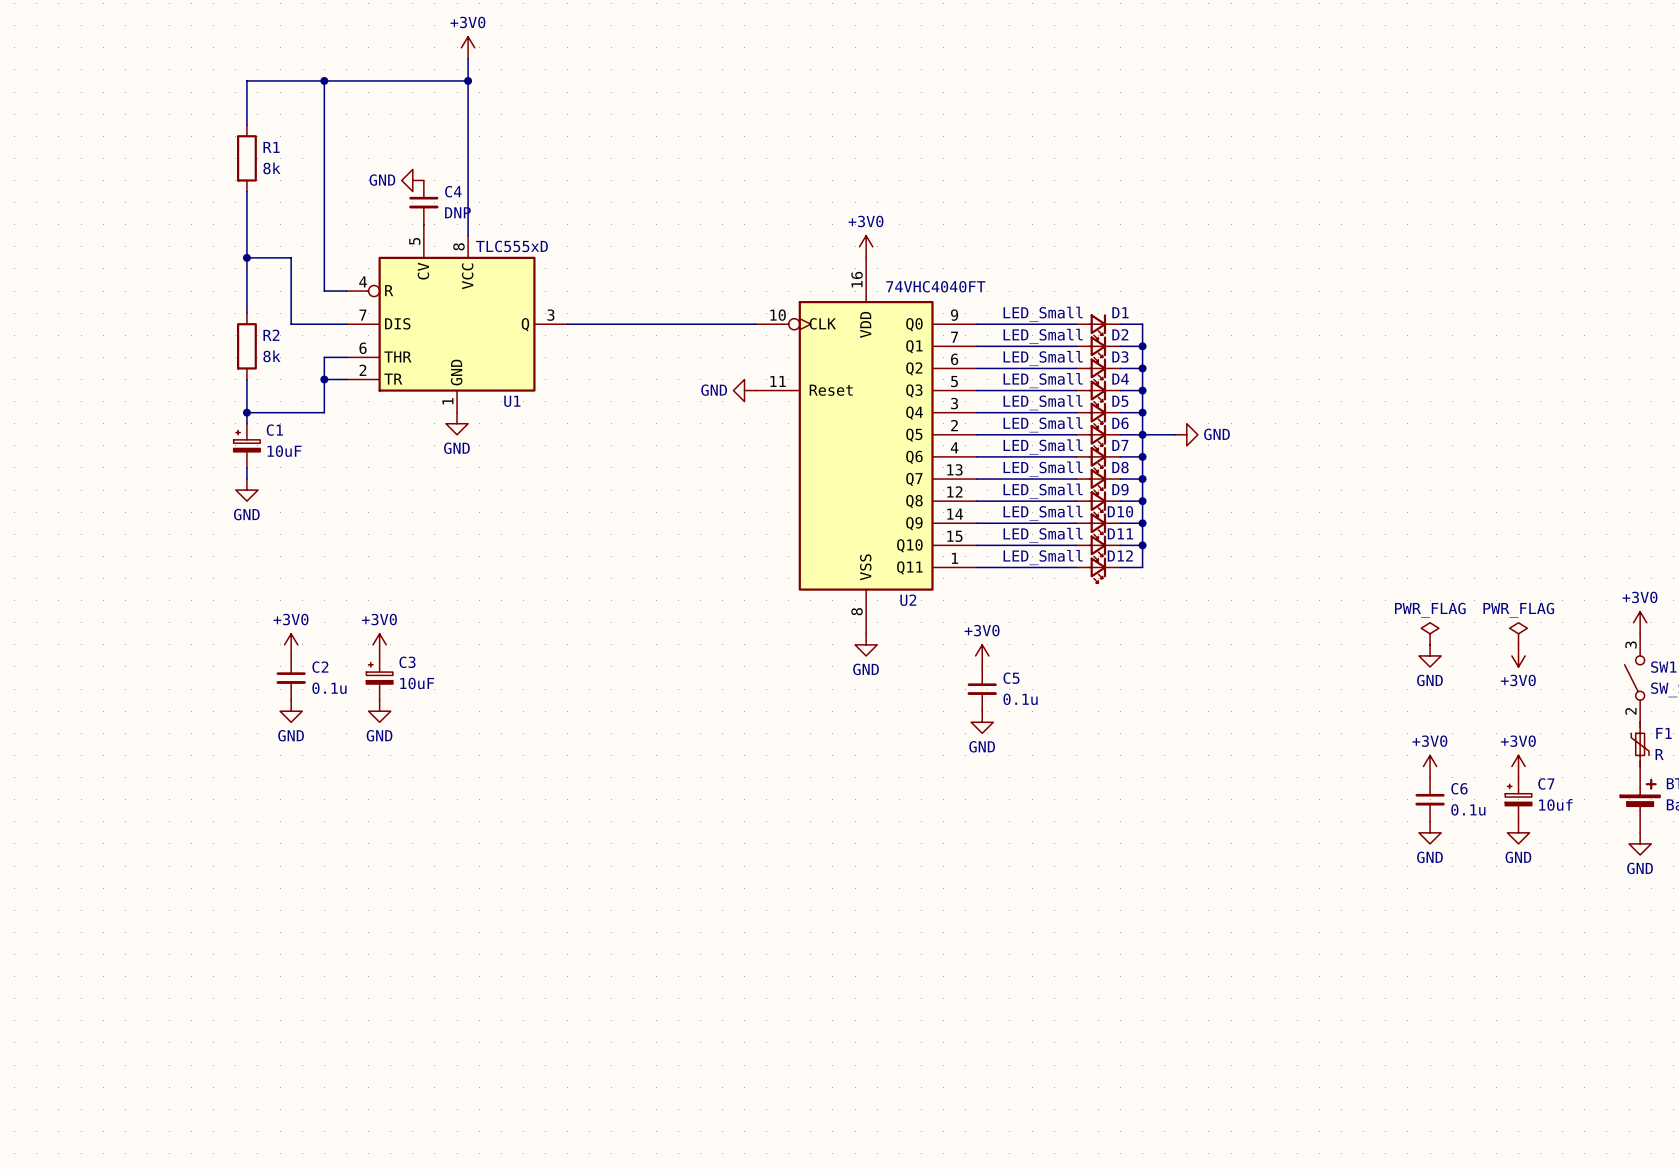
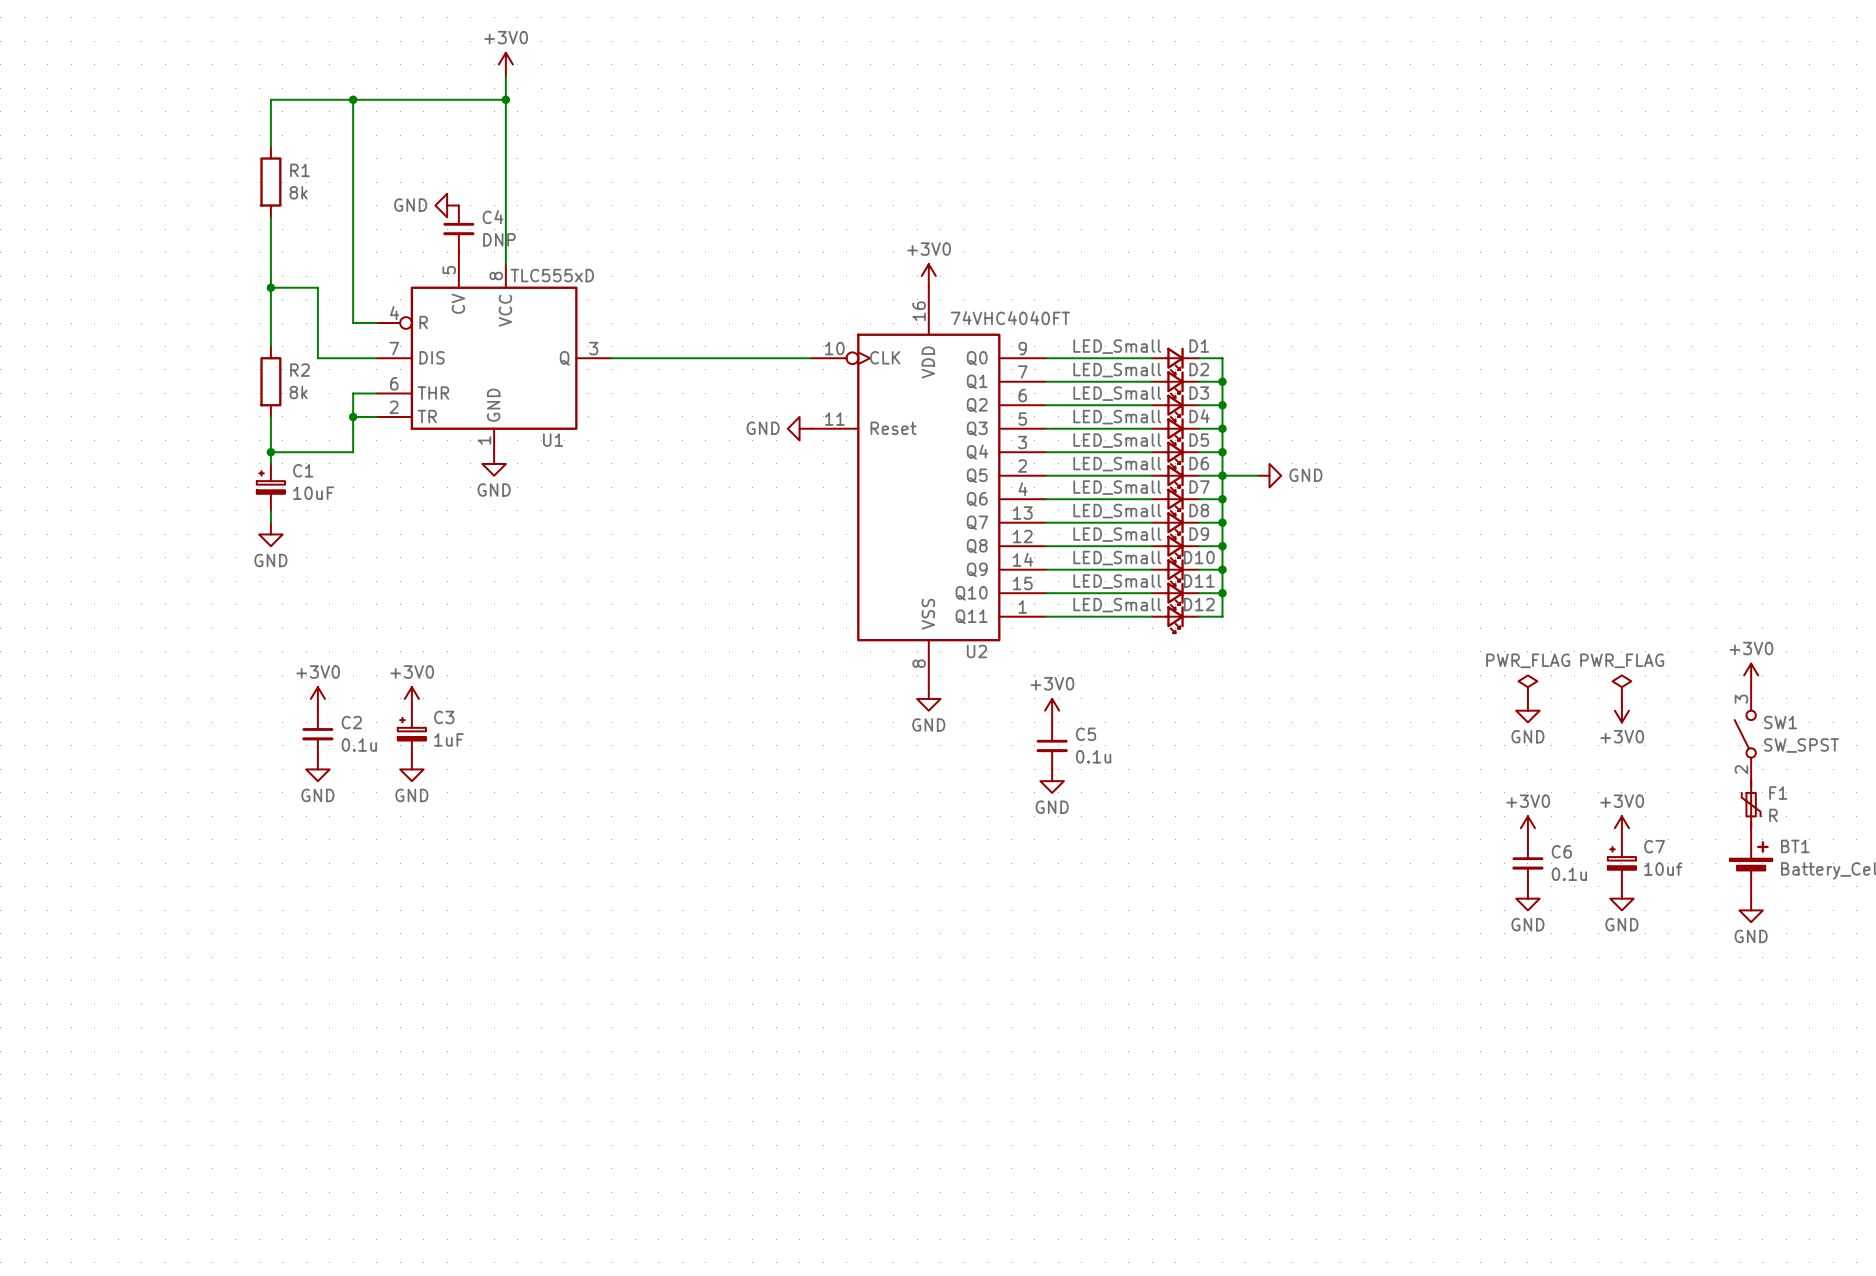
C3 value: 10uF (417, 683) -> 1uF (449, 739)

